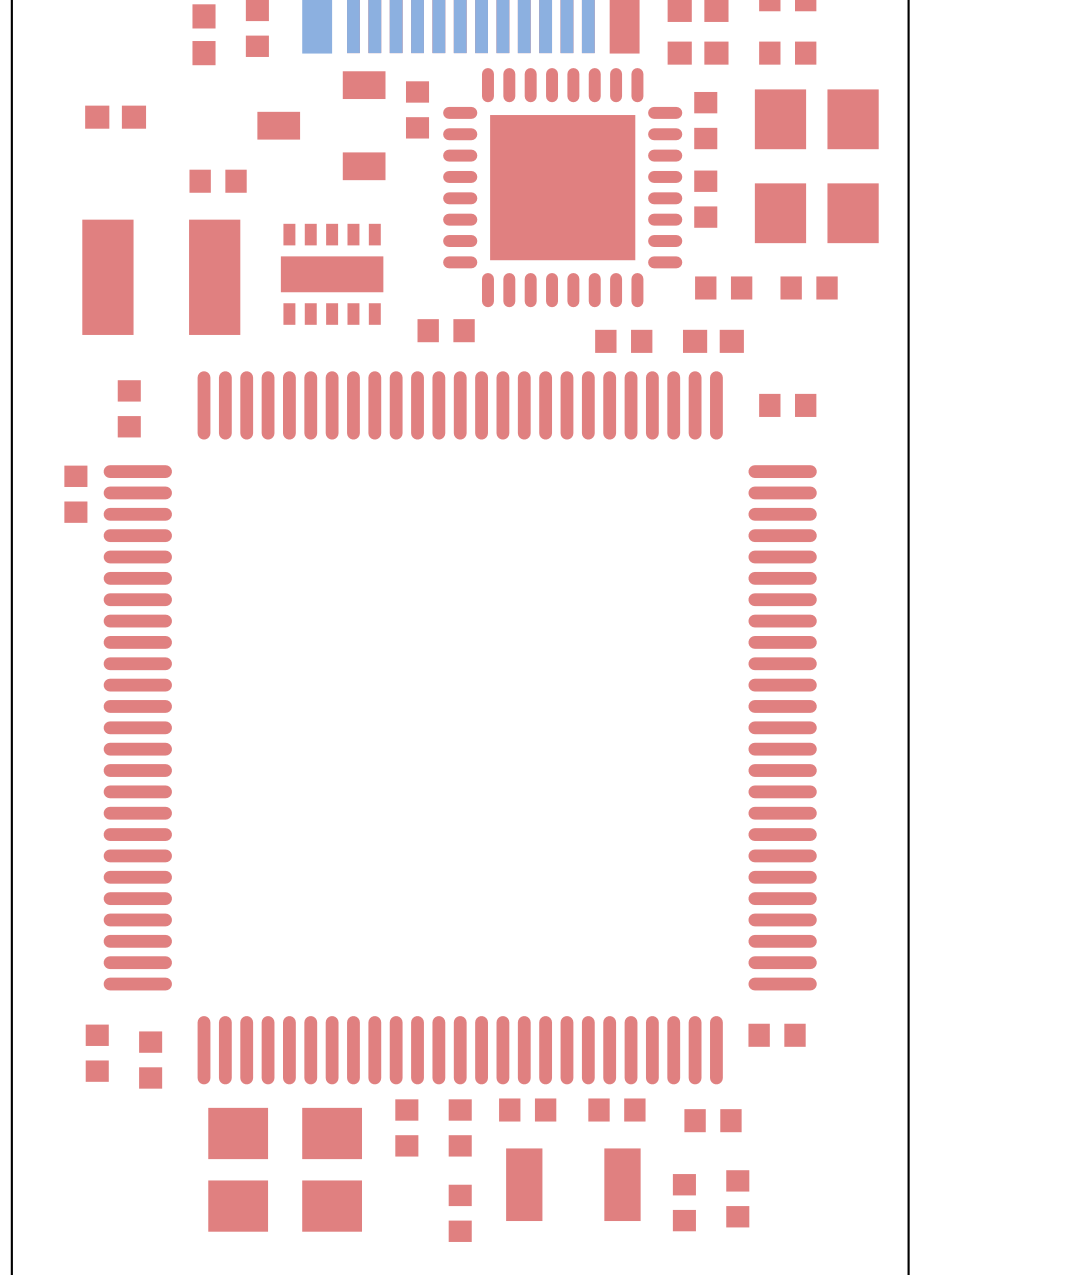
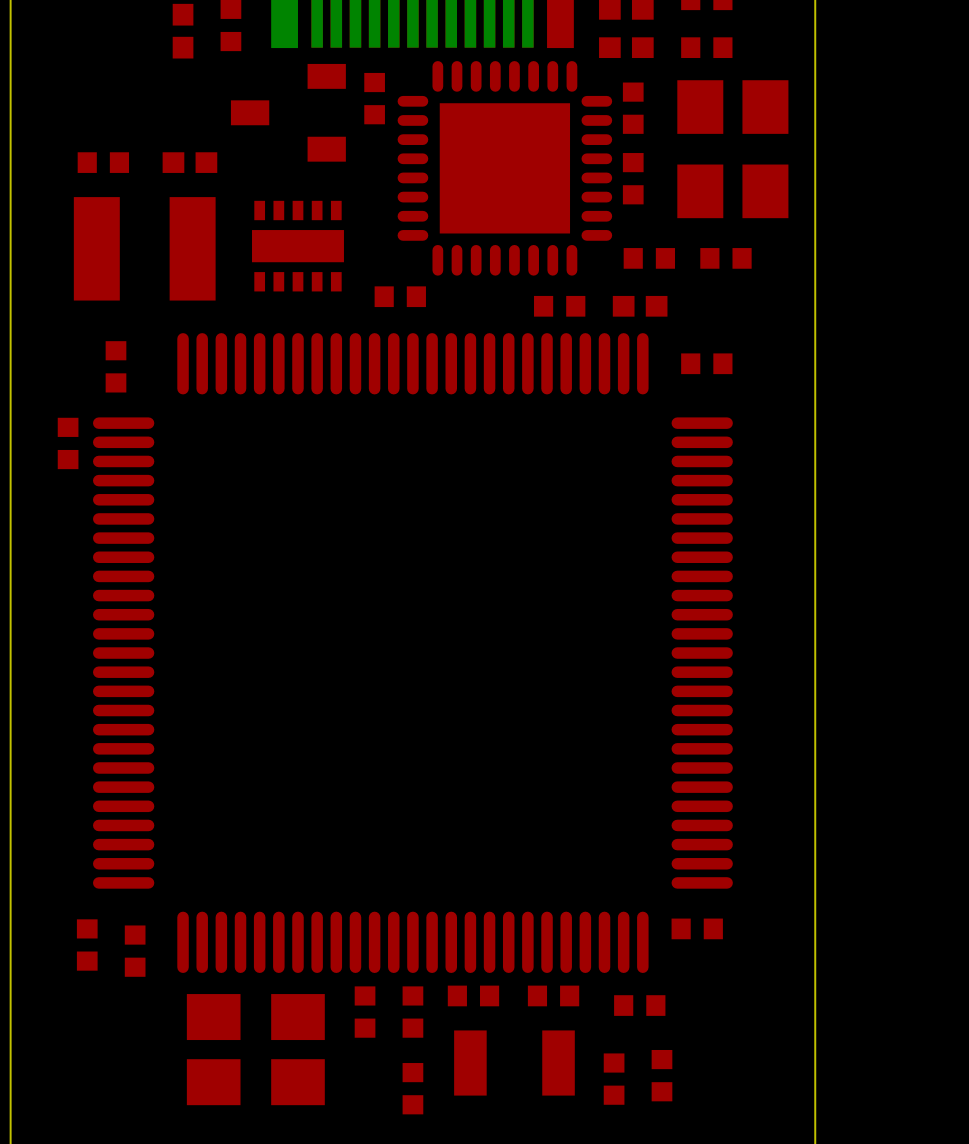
part: (115, 117) -> none
part footprint: [189, 169, 247, 193] -> [162, 152, 218, 173]
part: none -> (103, 162)

